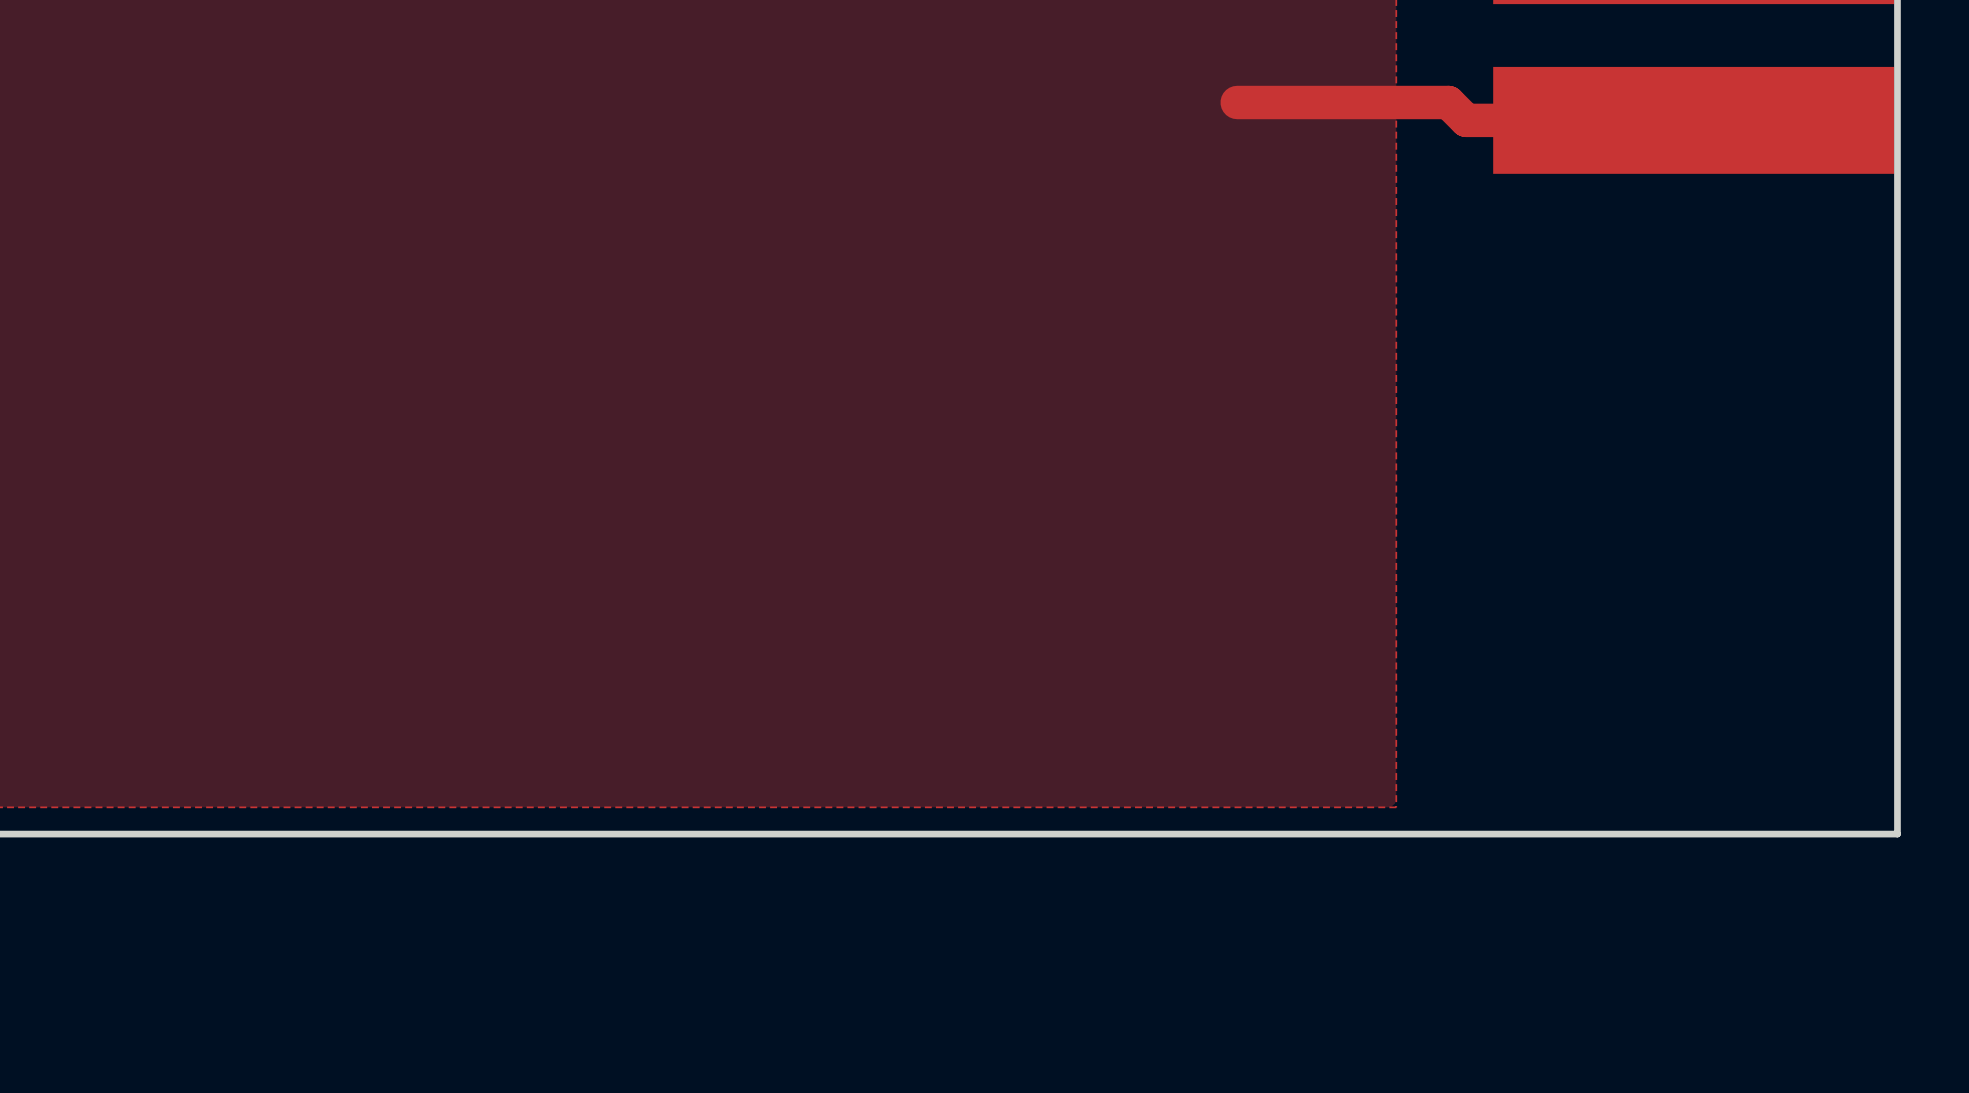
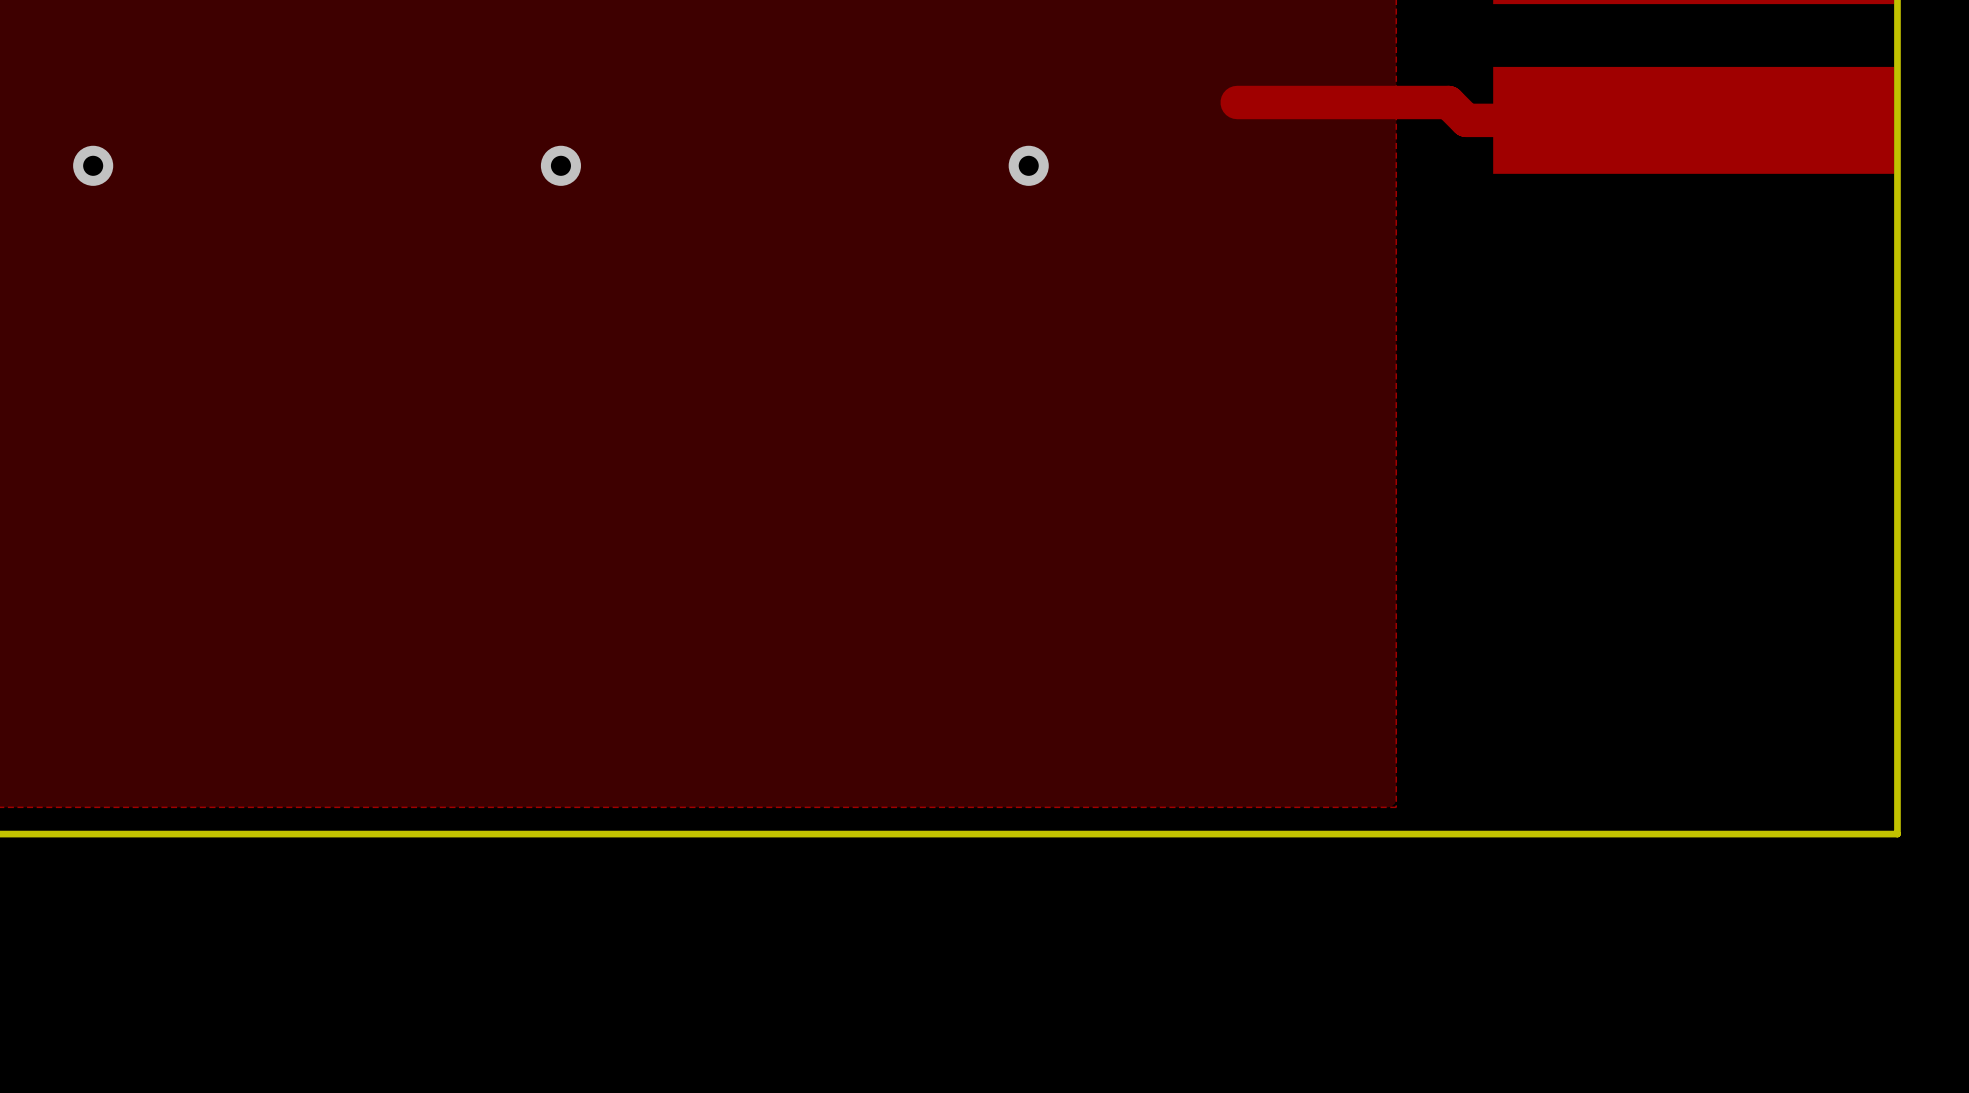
via: none -> (93, 165)
via: none -> (560, 165)
via: none -> (1028, 165)

